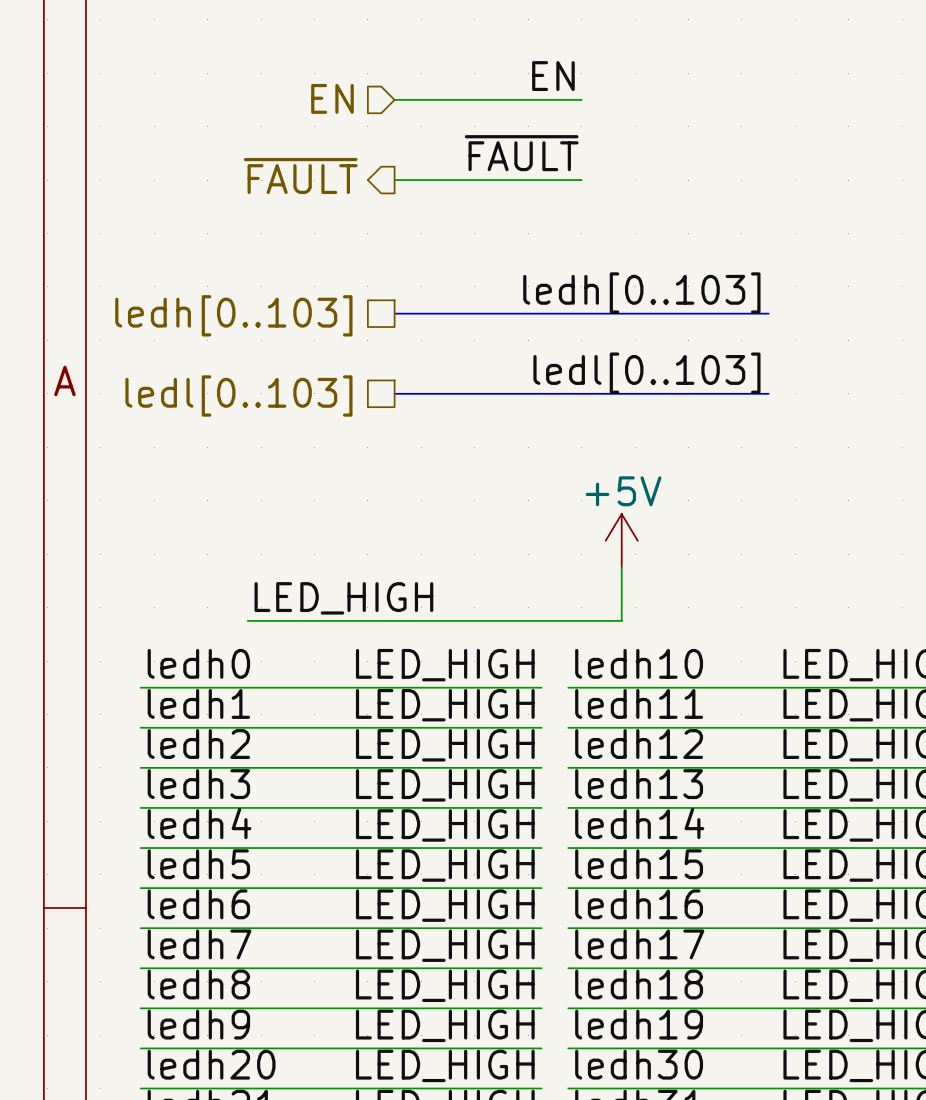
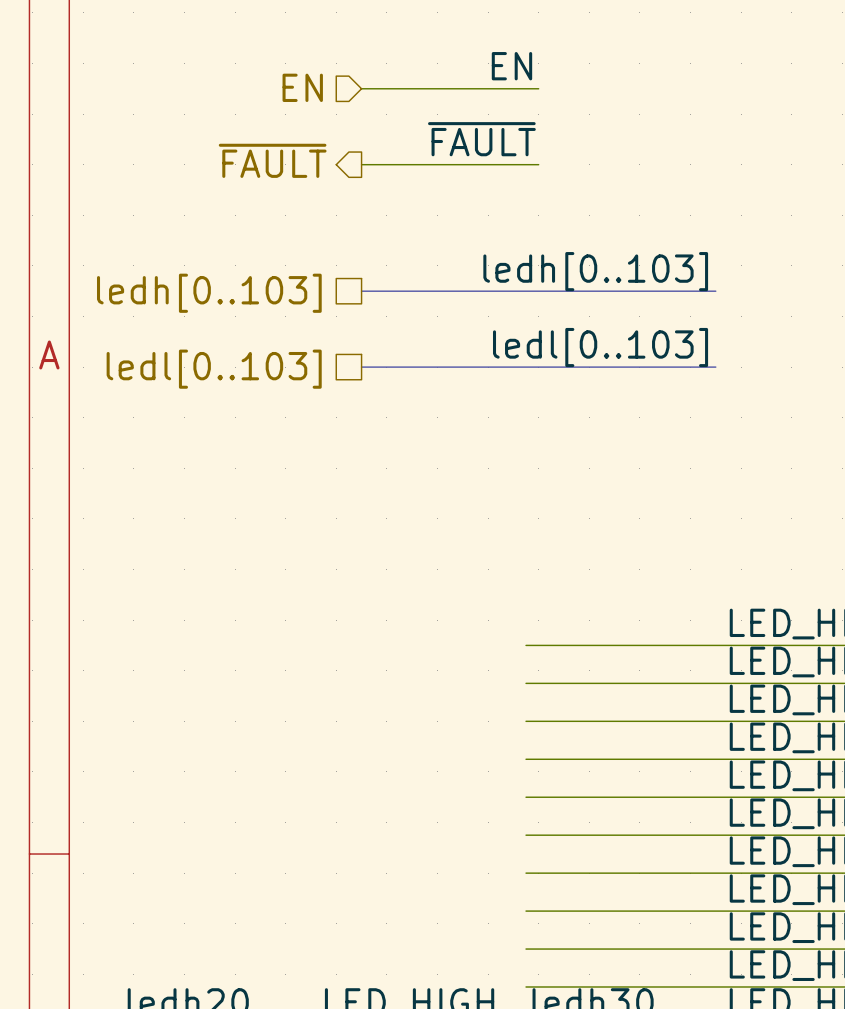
power symbol: +5V (621, 540) -> none
wire: (621, 567) (621, 620) (247, 620) -> none
label: LED_HIGH (343, 598) -> none
label: ledh0 (198, 663) -> none
label: ledh10 (639, 663) -> none
label: LED_HIGH (445, 665) -> none
wire: (140, 687) (541, 687) -> none
label: ledh1 (198, 703) -> none
label: ledh11 (639, 703) -> none
label: LED_HIGH (445, 705) -> none
wire: (140, 727) (541, 727) -> none
label: ledh2 (198, 744) -> none
label: ledh12 (639, 744) -> none
label: LED_HIGH (445, 745) -> none
wire: (140, 767) (541, 767) -> none
label: ledh3 (198, 784) -> none
label: ledh13 (639, 784) -> none
label: LED_HIGH (445, 785) -> none
wire: (140, 807) (541, 807) -> none
label: ledh4 (199, 823) -> none
label: ledh14 (639, 823) -> none
label: LED_HIGH (445, 825) -> none
wire: (140, 848) (541, 848) -> none
label: ledh5 (198, 864) -> none
label: ledh15 (639, 864) -> none
label: LED_HIGH (445, 865) -> none
wire: (140, 888) (541, 888) -> none
label: ledh6 (198, 904) -> none
label: ledh16 (639, 904) -> none
label: LED_HIGH (445, 905) -> none
wire: (140, 928) (541, 928) -> none
label: ledh7 (199, 944) -> none
label: ledh17 (639, 944) -> none
label: LED_HIGH (445, 945) -> none
wire: (140, 968) (541, 968) -> none
label: ledh8 (198, 984) -> none
label: ledh18 (639, 984) -> none
label: LED_HIGH (445, 985) -> none
wire: (140, 1008) (541, 1008) -> none
label: ledh9 (198, 1024) -> none
label: ledh19 (639, 1024) -> none
label: LED_HIGH (445, 1025) -> none
wire: (140, 1048) (541, 1048) -> none

